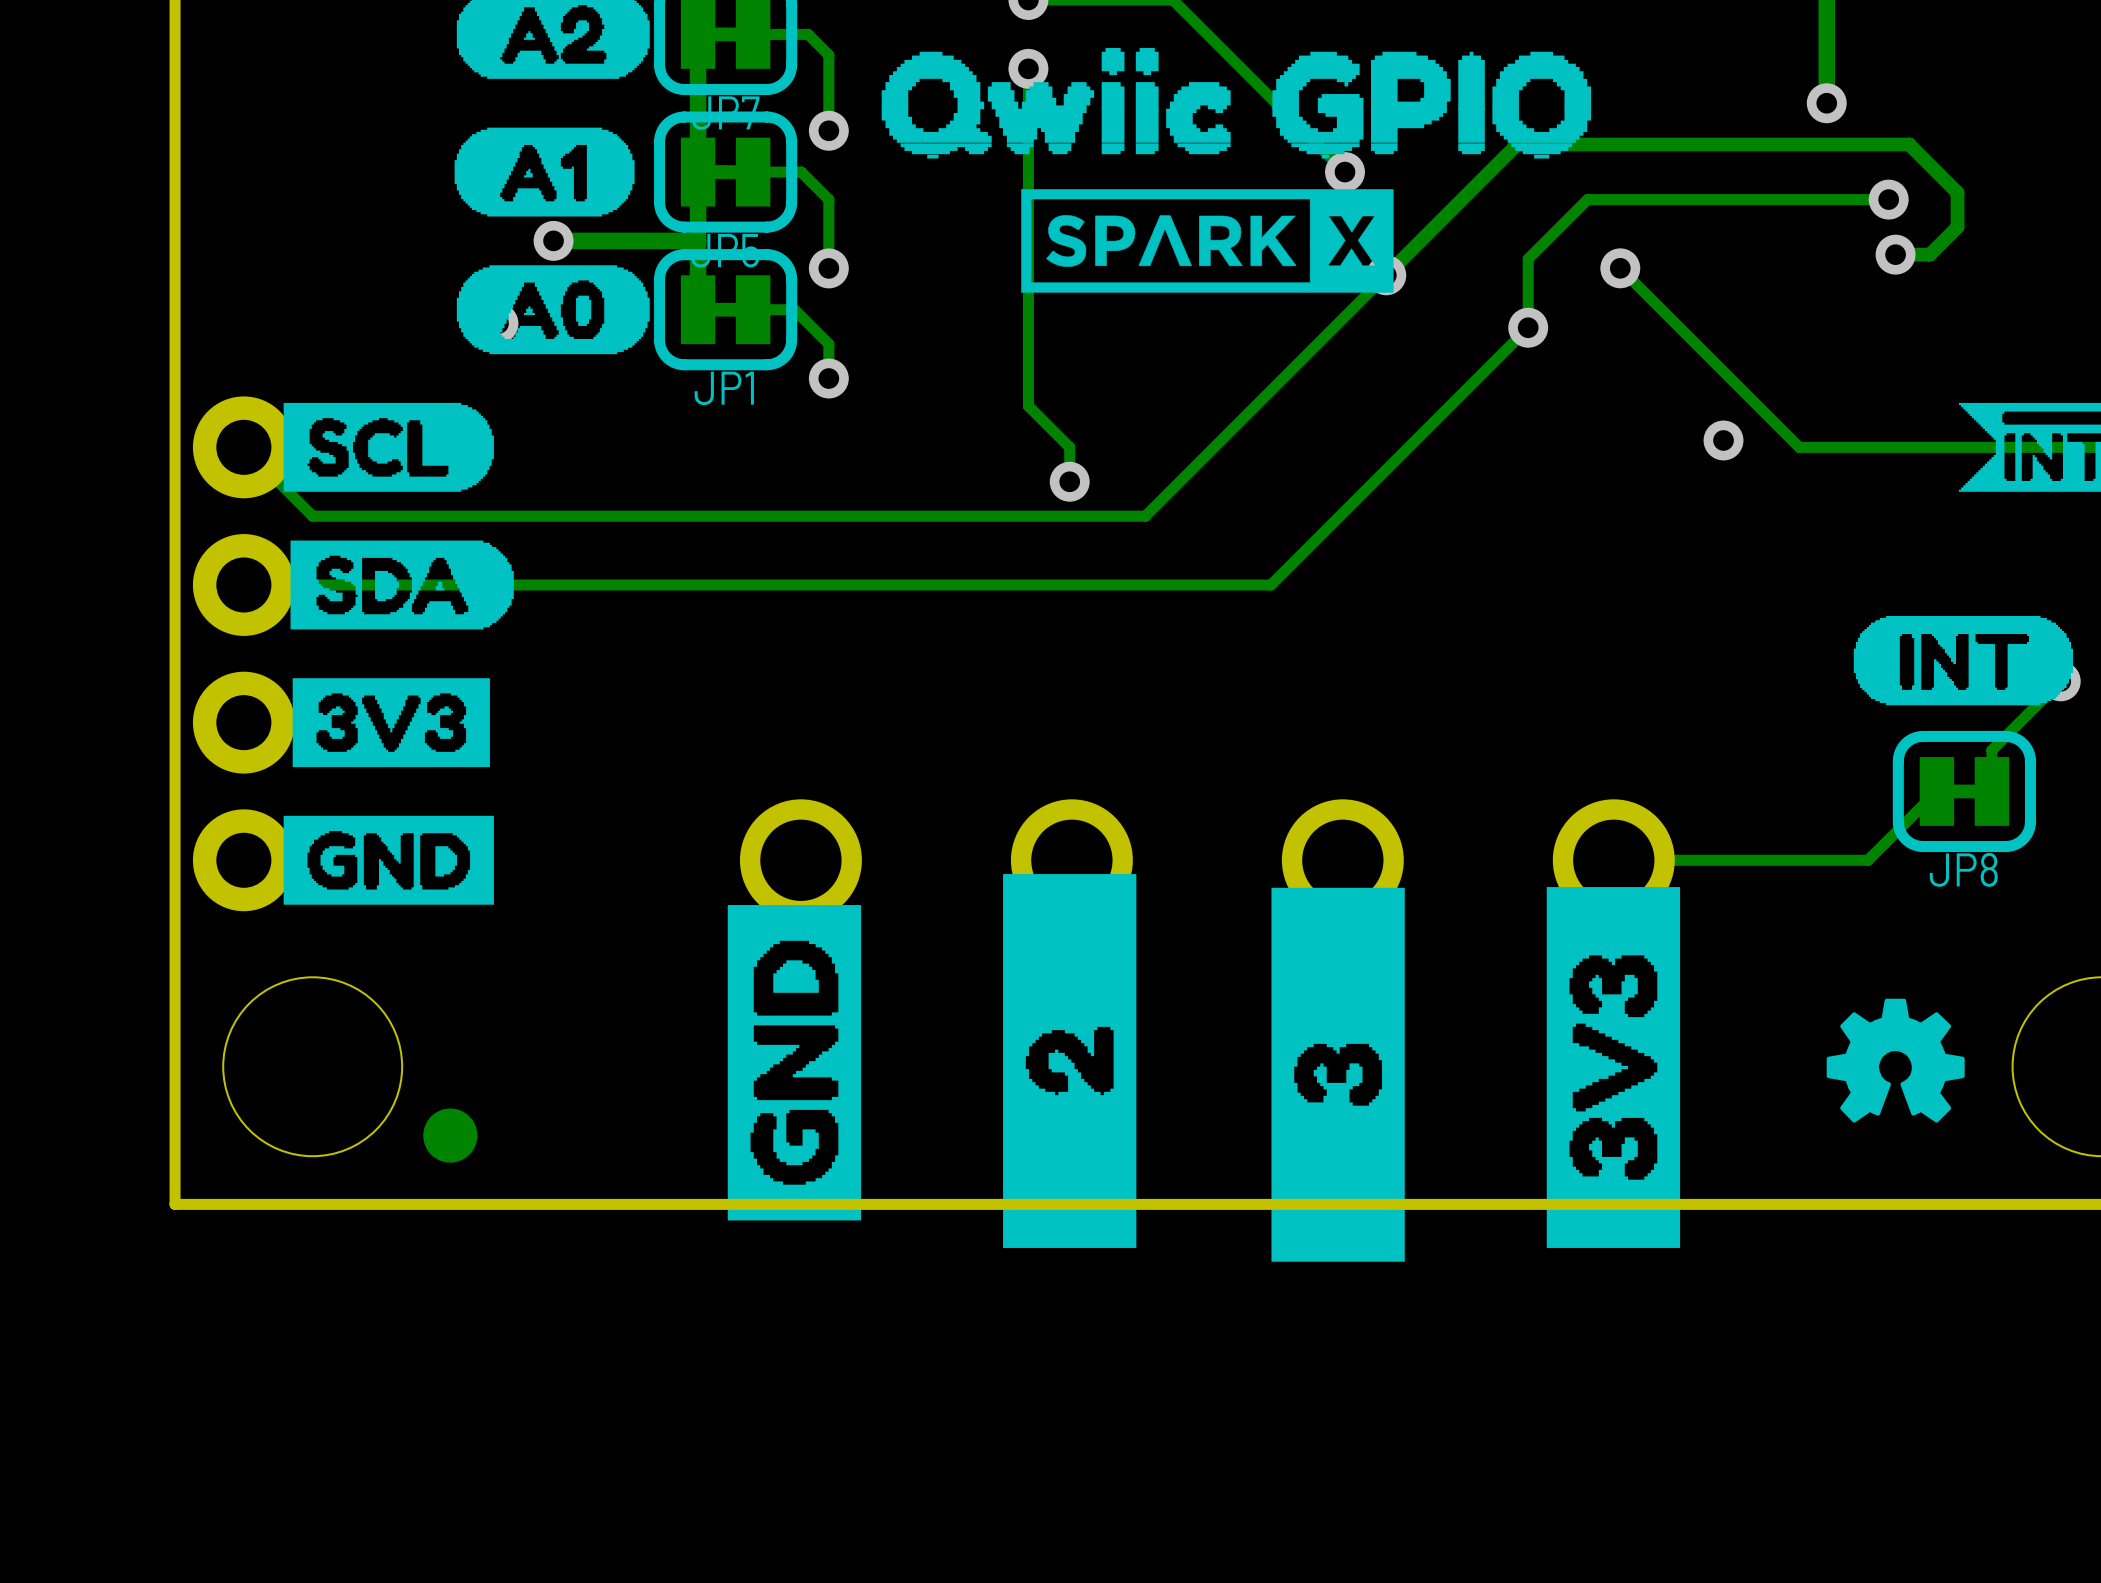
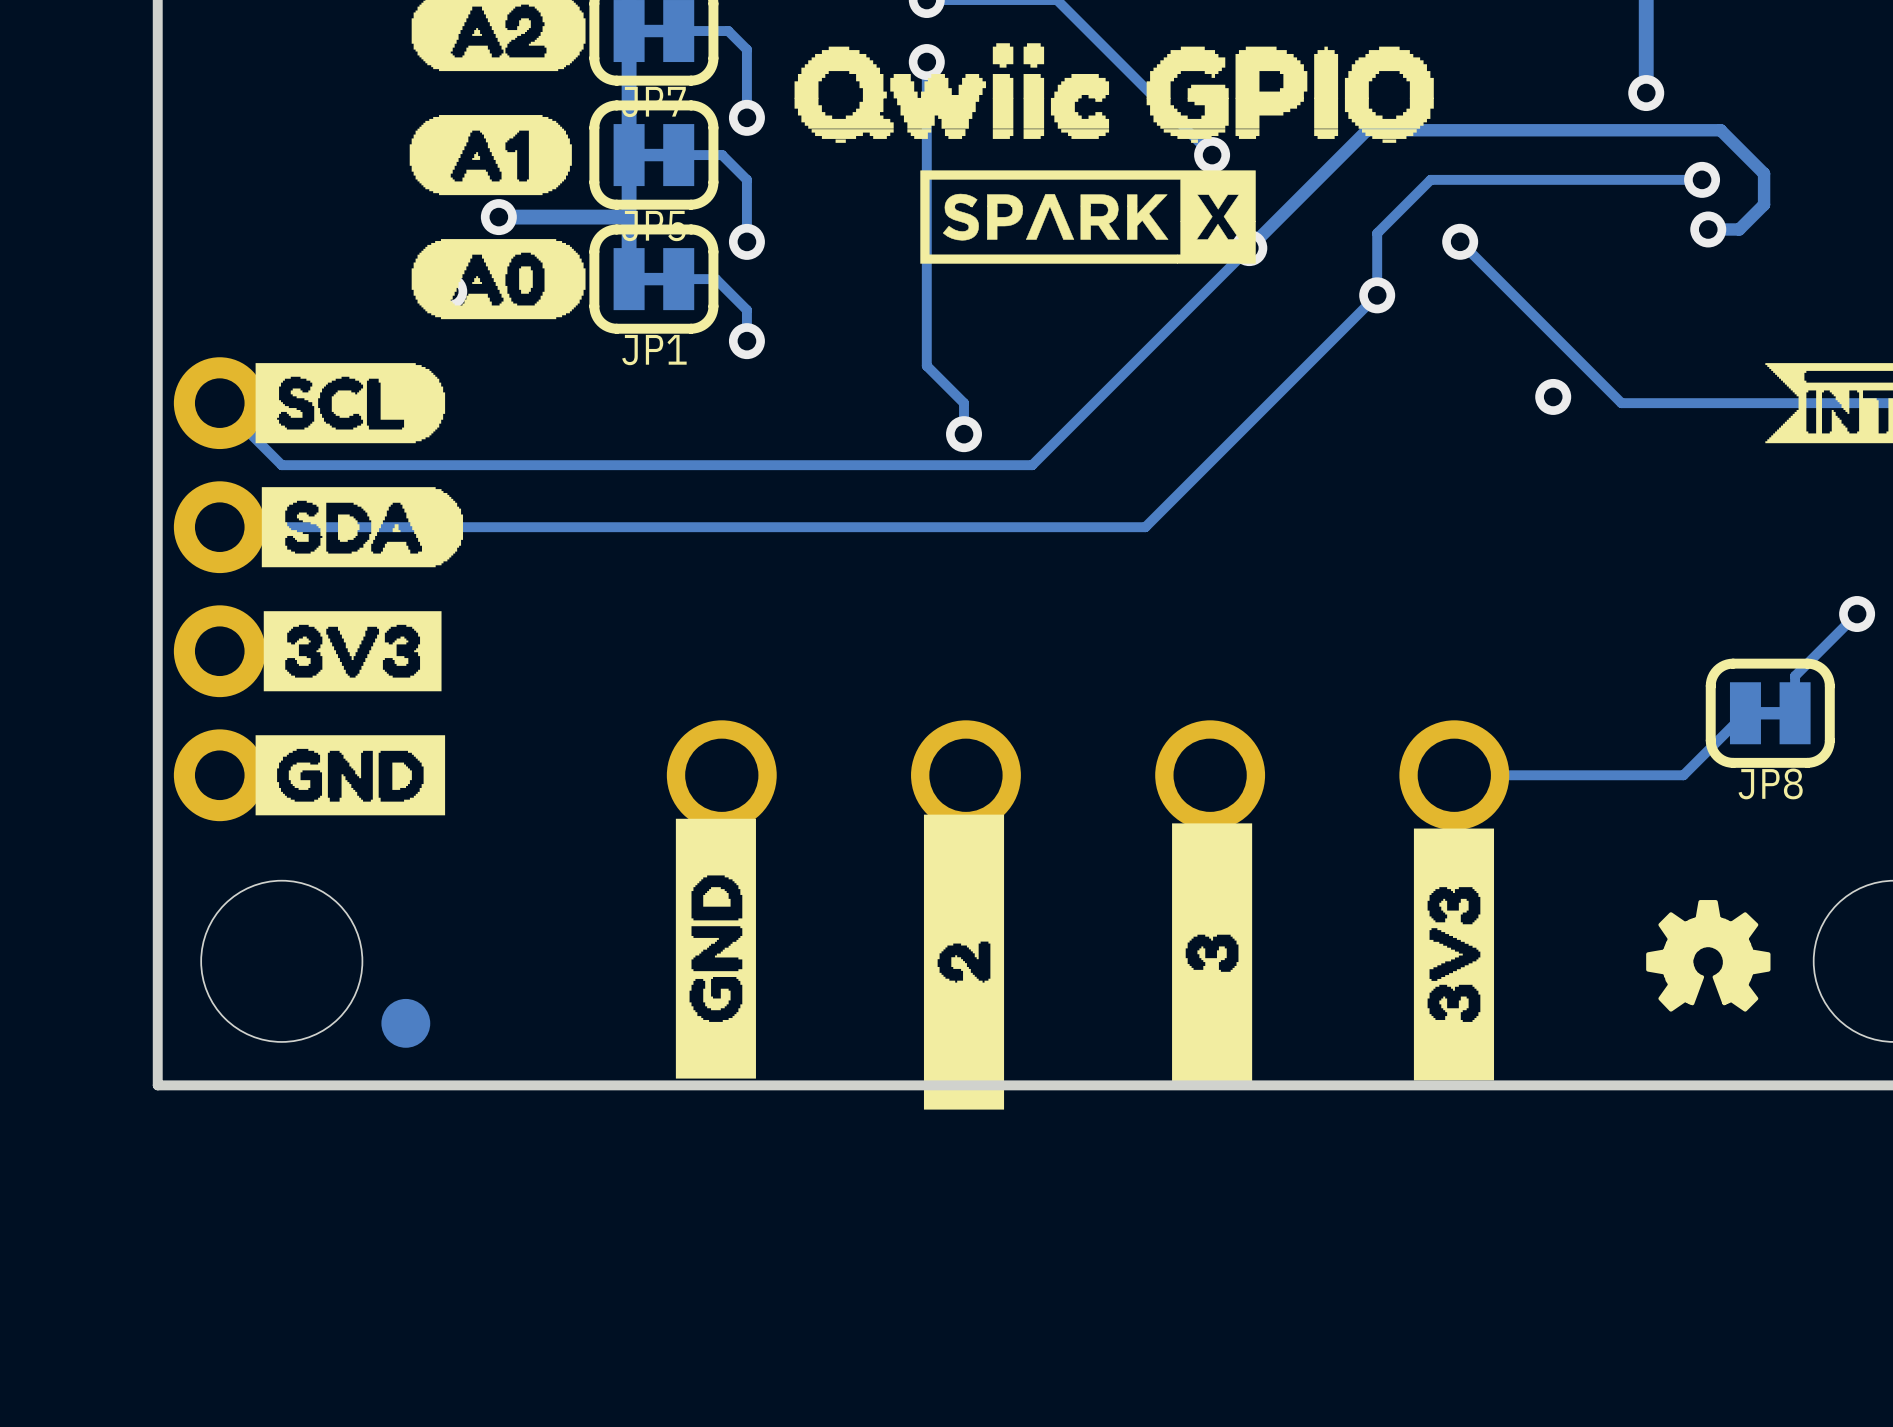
drawing: [1853, 616, 2073, 706] -> none
drawing shape: [1003, 874, 1137, 1248] -> [923, 814, 1005, 1110]
drawing shape: [1271, 887, 1405, 1262] -> [1172, 823, 1253, 1084]
drawing shape: [1546, 887, 1681, 1248] -> [1413, 828, 1495, 1081]
drawing shape: [727, 905, 862, 1221] -> [675, 818, 756, 1079]

